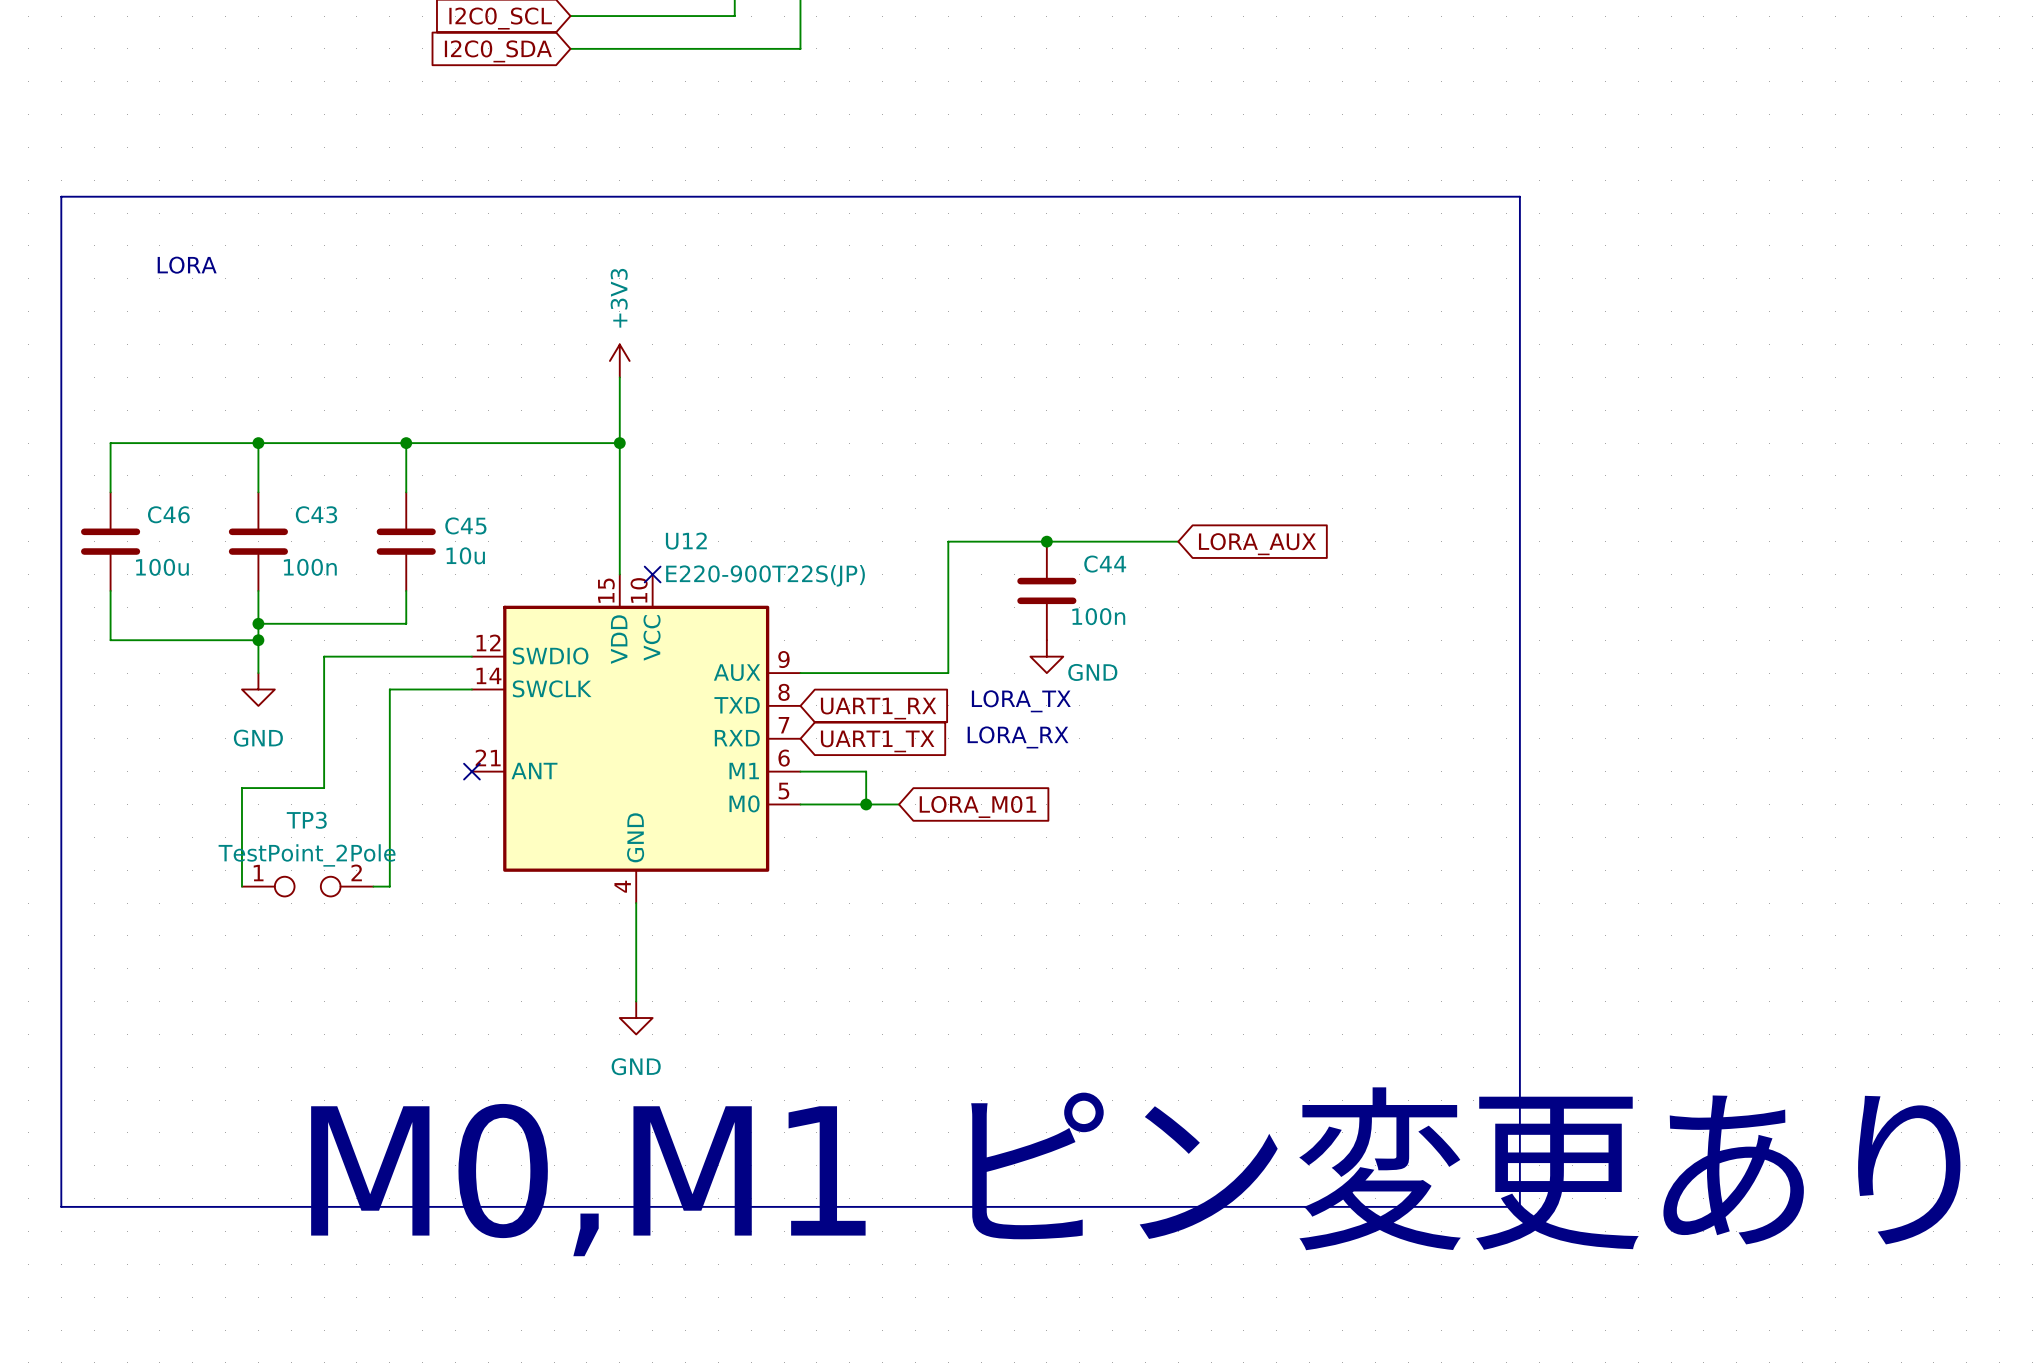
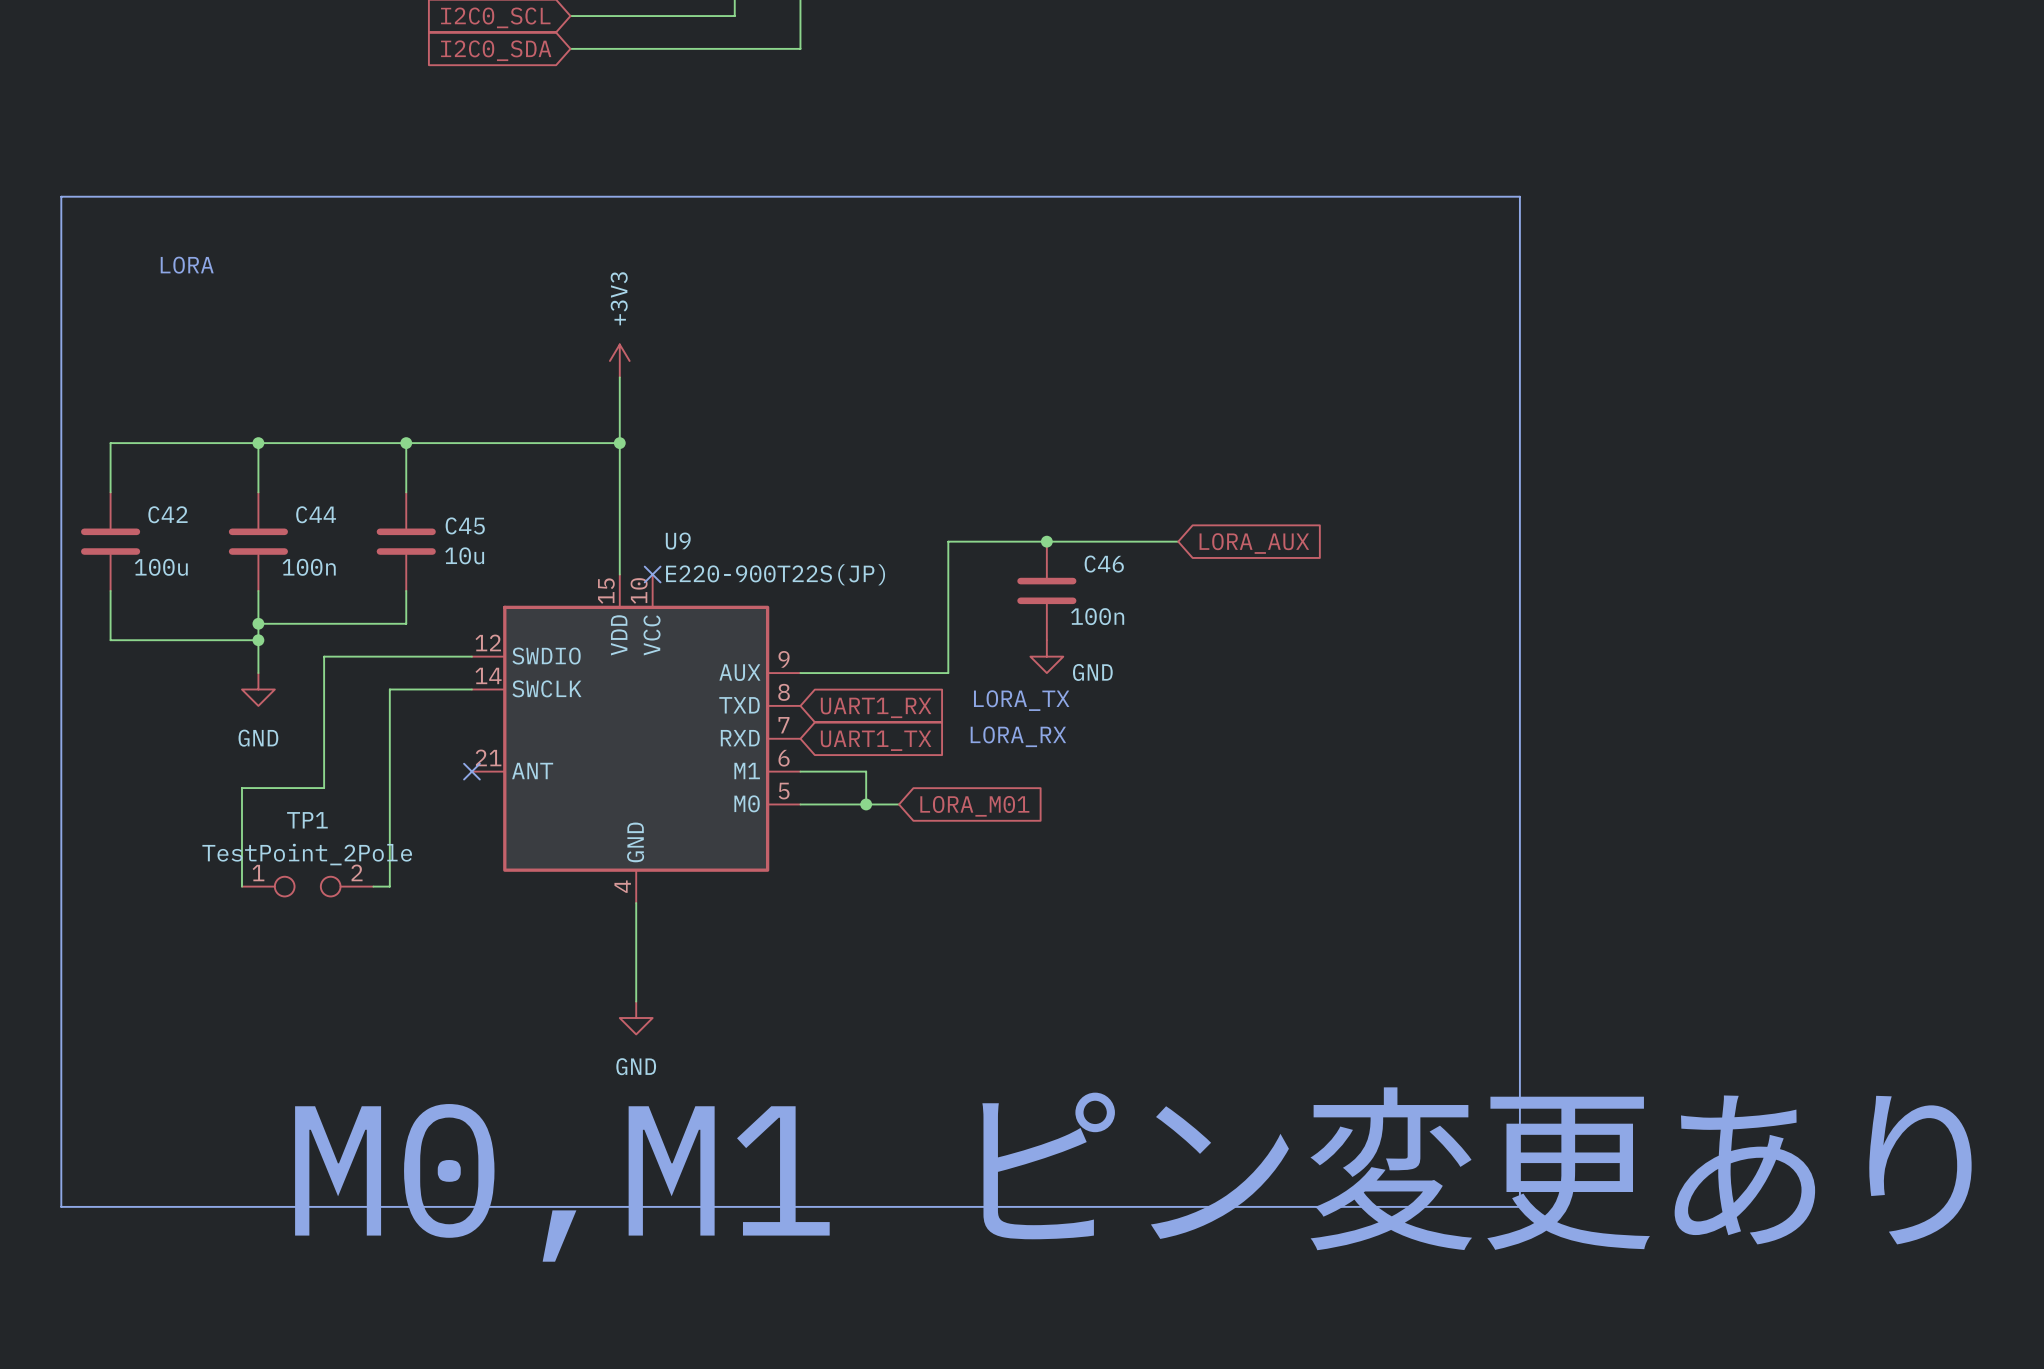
C46 name: C46 (168, 514) -> C42 (167, 514)
C43 name: C43 (316, 514) -> C44 (316, 514)
U12 name: U12 (686, 541) -> U9 (678, 541)
C44 name: C44 (1105, 564) -> C46 (1104, 564)
TP3 name: TP3 (306, 820) -> TP1 (307, 820)

